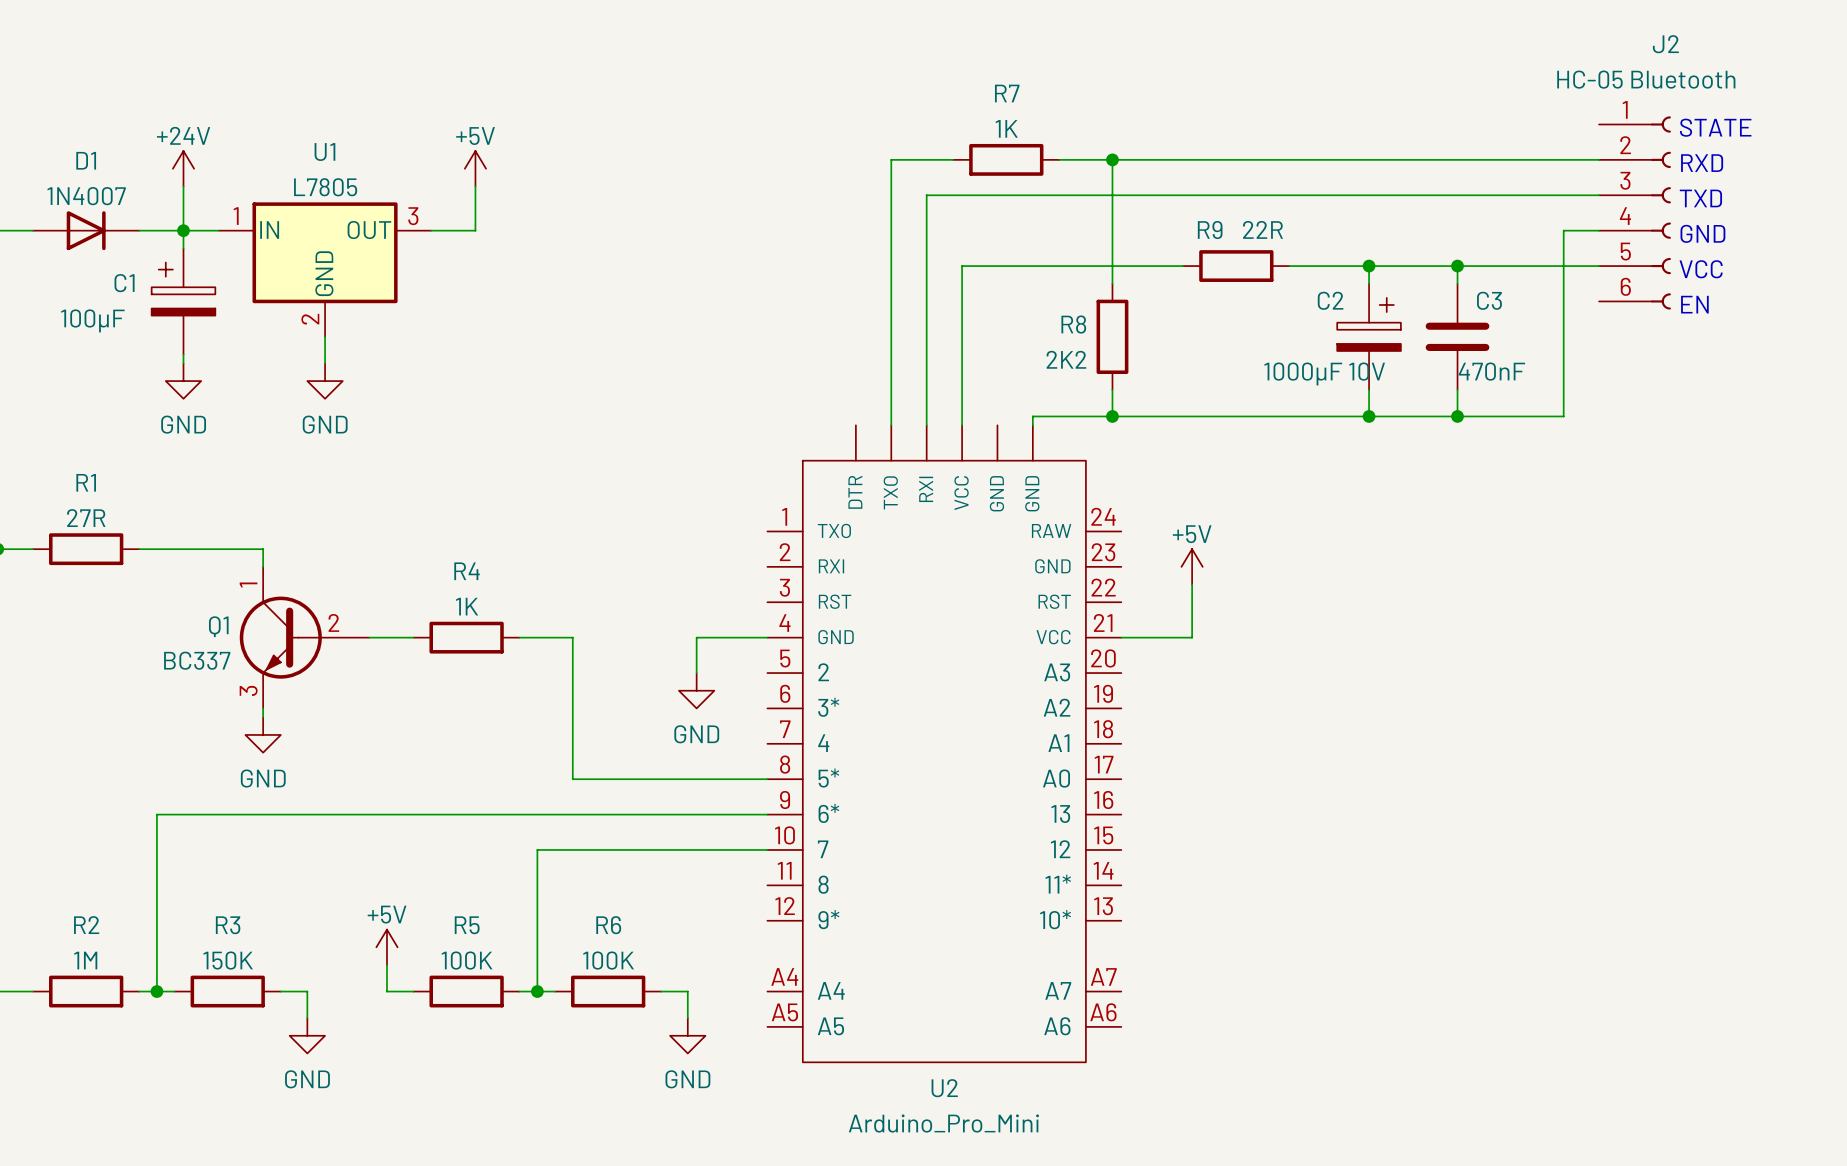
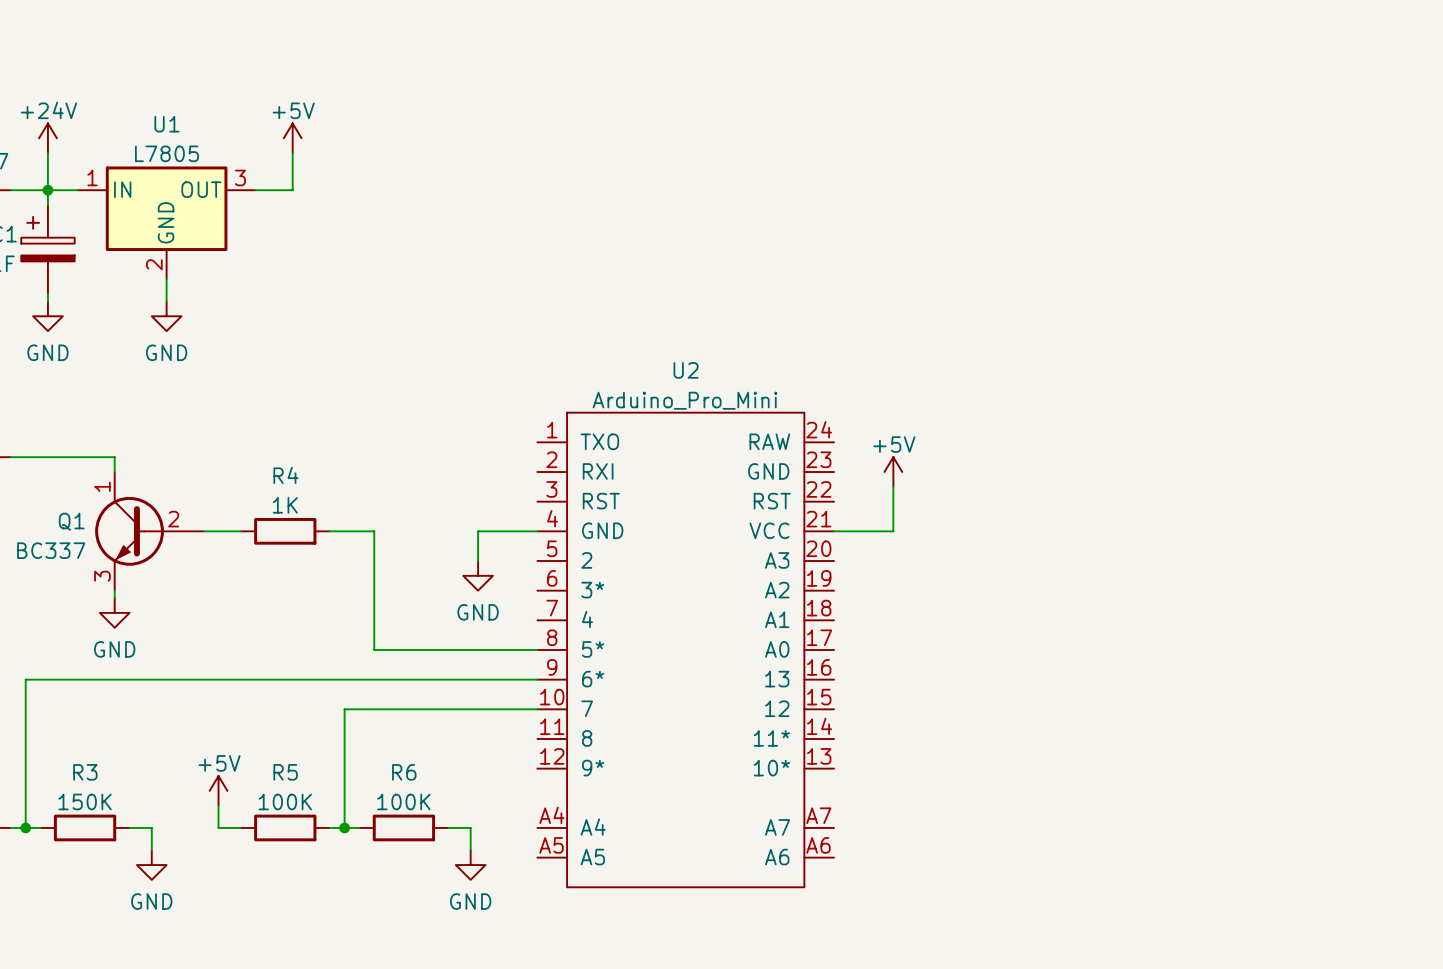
text: STATE (1715, 127) -> none
wire: (953, 159) (891, 159) (891, 425) -> none
R7: 1K (1006, 159) -> none
wire: (1059, 159) (1599, 159) -> none
wire: (1112, 159) (1112, 283) -> none
junction: (1112, 159) -> none
text: RXD (1702, 163) -> none
wire: (1599, 195) (926, 195) (926, 425) -> none
text: TXD (1700, 198) -> none
J2: HC-05 Bluetooth (1635, 212) -> none
wire: (1599, 230) (1563, 230) (1563, 416) (1032, 416) (1032, 425) -> none
text: GND (1702, 233) -> none
wire: (1183, 266) (962, 266) (962, 425) -> none
R9: 22R (1236, 266) -> none
wire: (1289, 266) (1599, 266) -> none
wire: (1369, 266) (1369, 283) -> none
junction: (1369, 266) -> none
wire: (1457, 266) (1457, 283) -> none
junction: (1457, 266) -> none
text: VCC (1701, 269) -> none
text: EN (1694, 304) -> none
R8: 2K2 (1112, 336) -> none
C2: 1000µF 10V (1369, 336) -> none
C3: 470nF (1457, 336) -> none
wire: (1112, 389) (1112, 416) -> none
wire: (1369, 389) (1369, 416) -> none
wire: (1457, 389) (1457, 416) -> none
junction: (1112, 416) -> none
junction: (1369, 416) -> none
junction: (1457, 416) -> none
U2 symbol: [767, 425, 1122, 1063] -> [537, 412, 835, 888]
U2 name position: U2 (944, 1088) -> U2 (686, 370)
U2 value position: Arduino_Pro_Mini (943, 1123) -> Arduino_Pro_Mini (685, 400)

